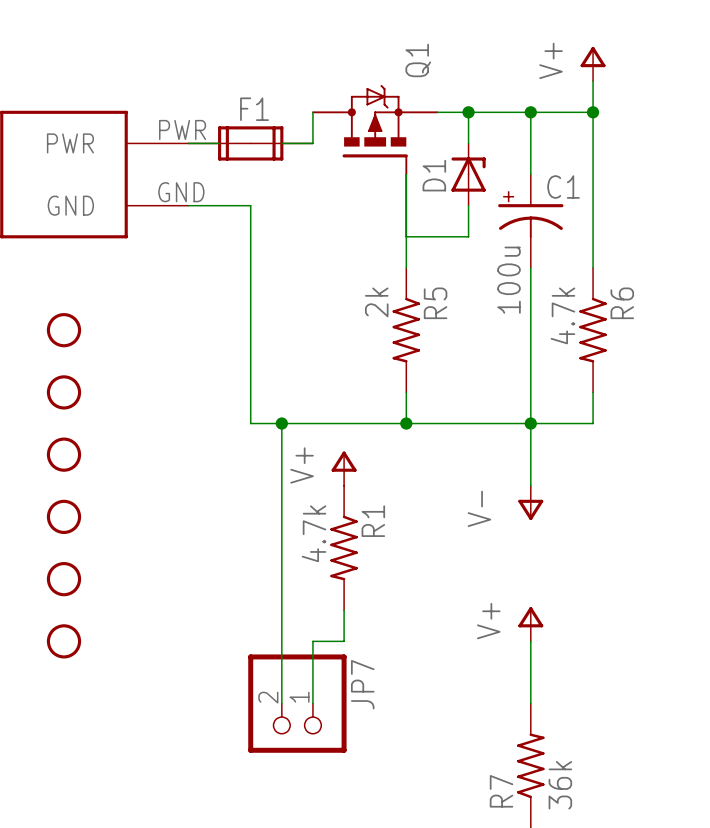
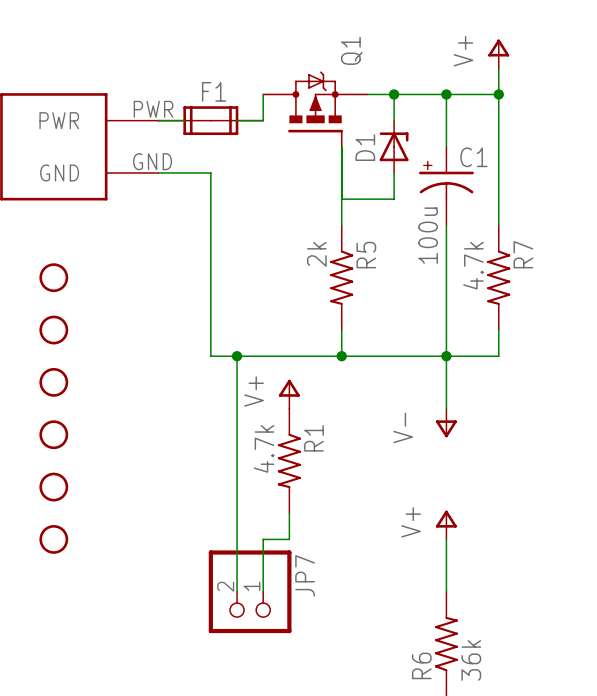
R6 name: R6 (622, 303) -> R7 (523, 254)
R7 name: R7 (501, 791) -> R6 (421, 665)

